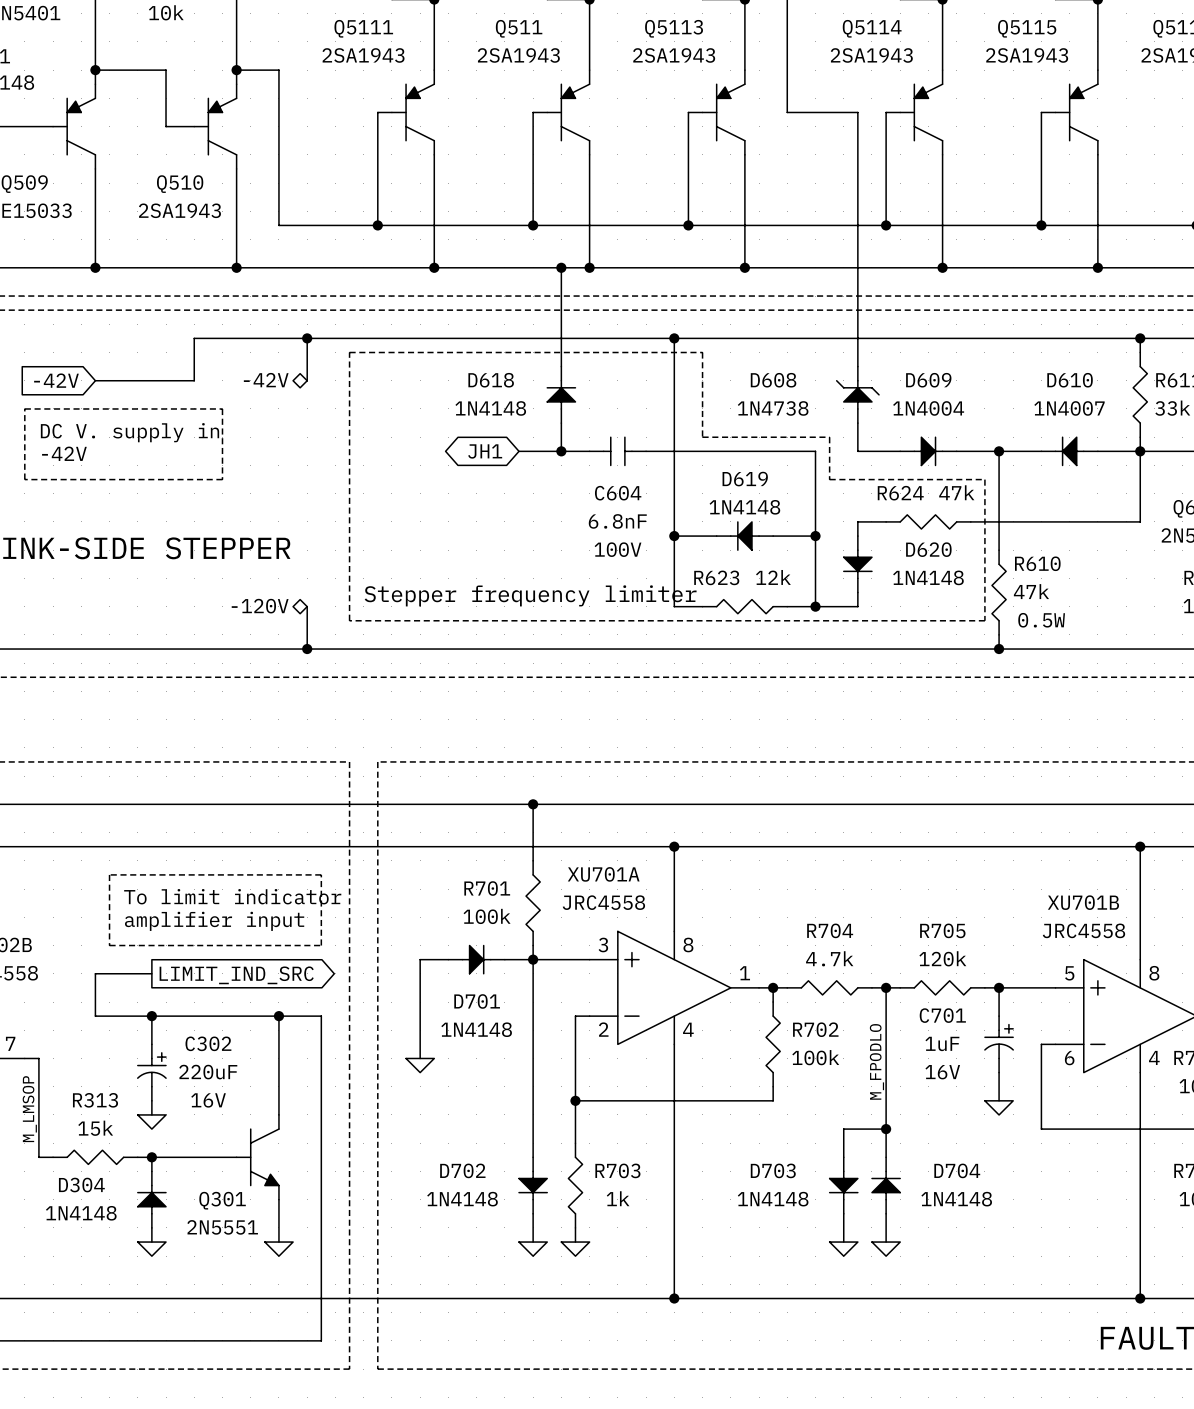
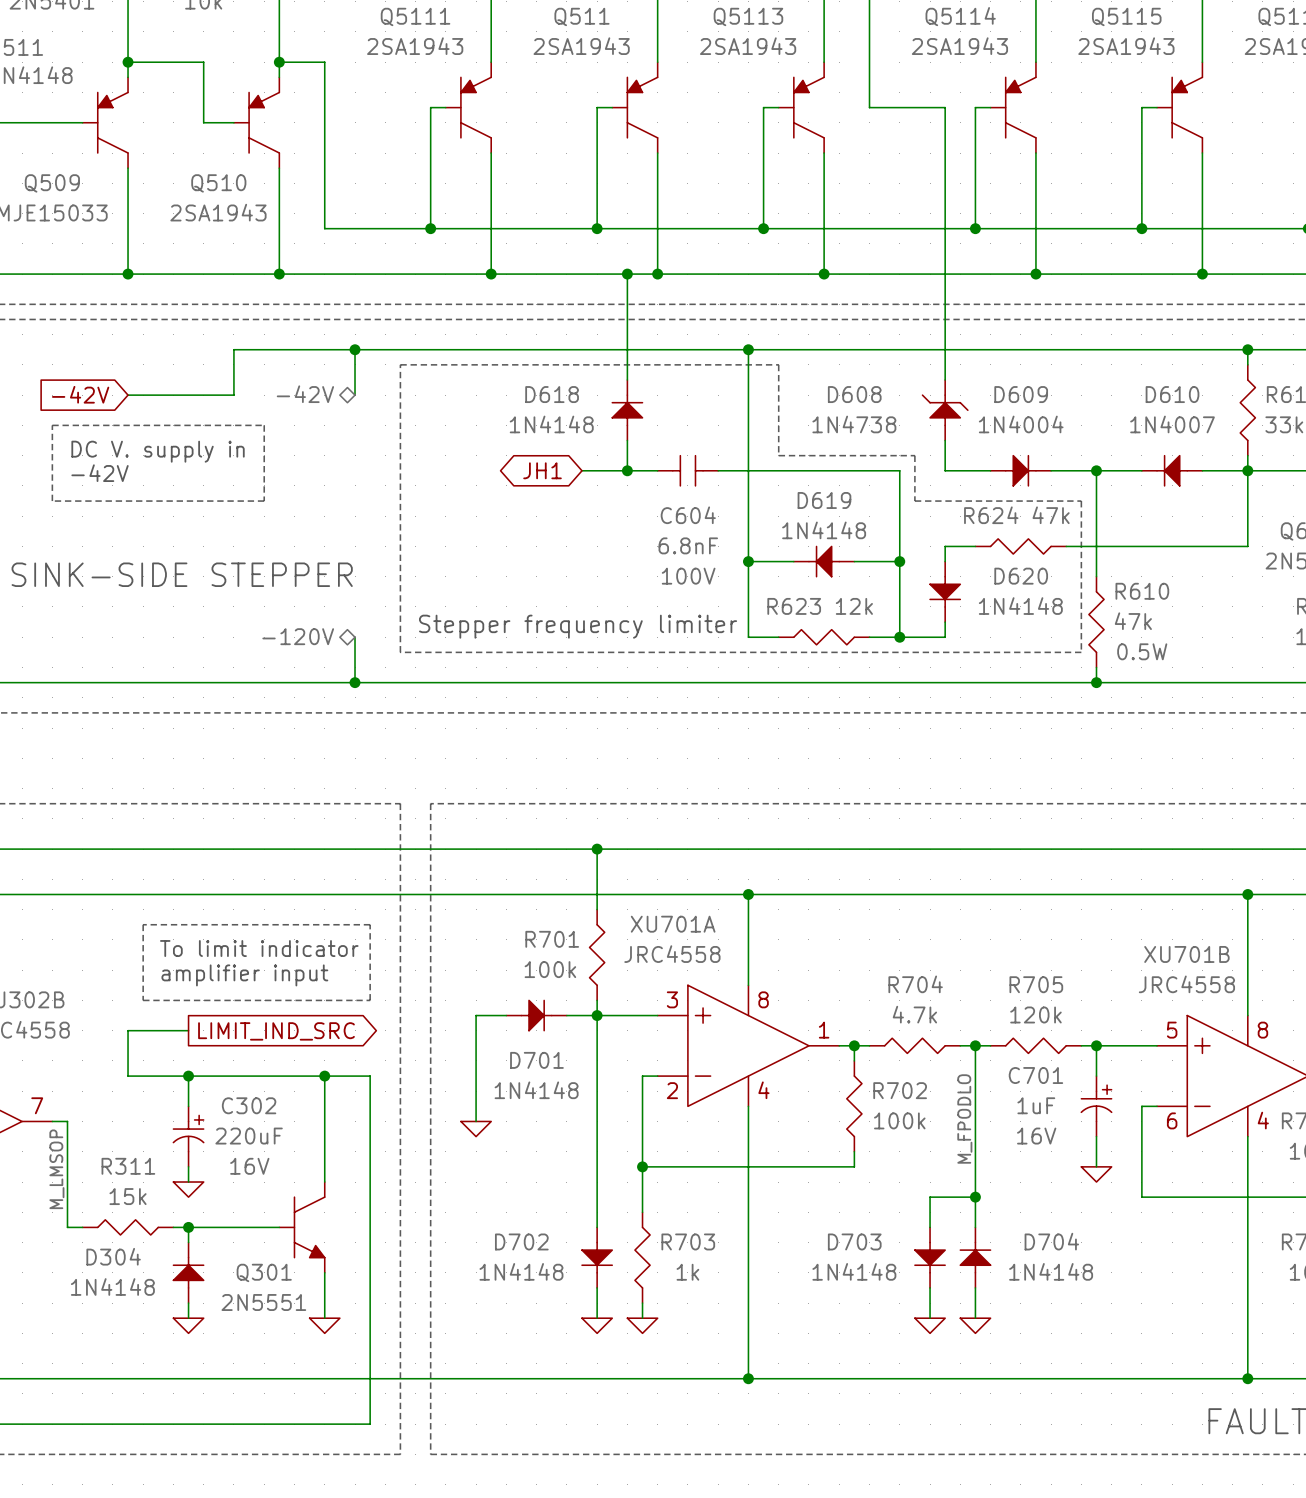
R313 name: R313 (95, 1100) -> R311 (128, 1166)

